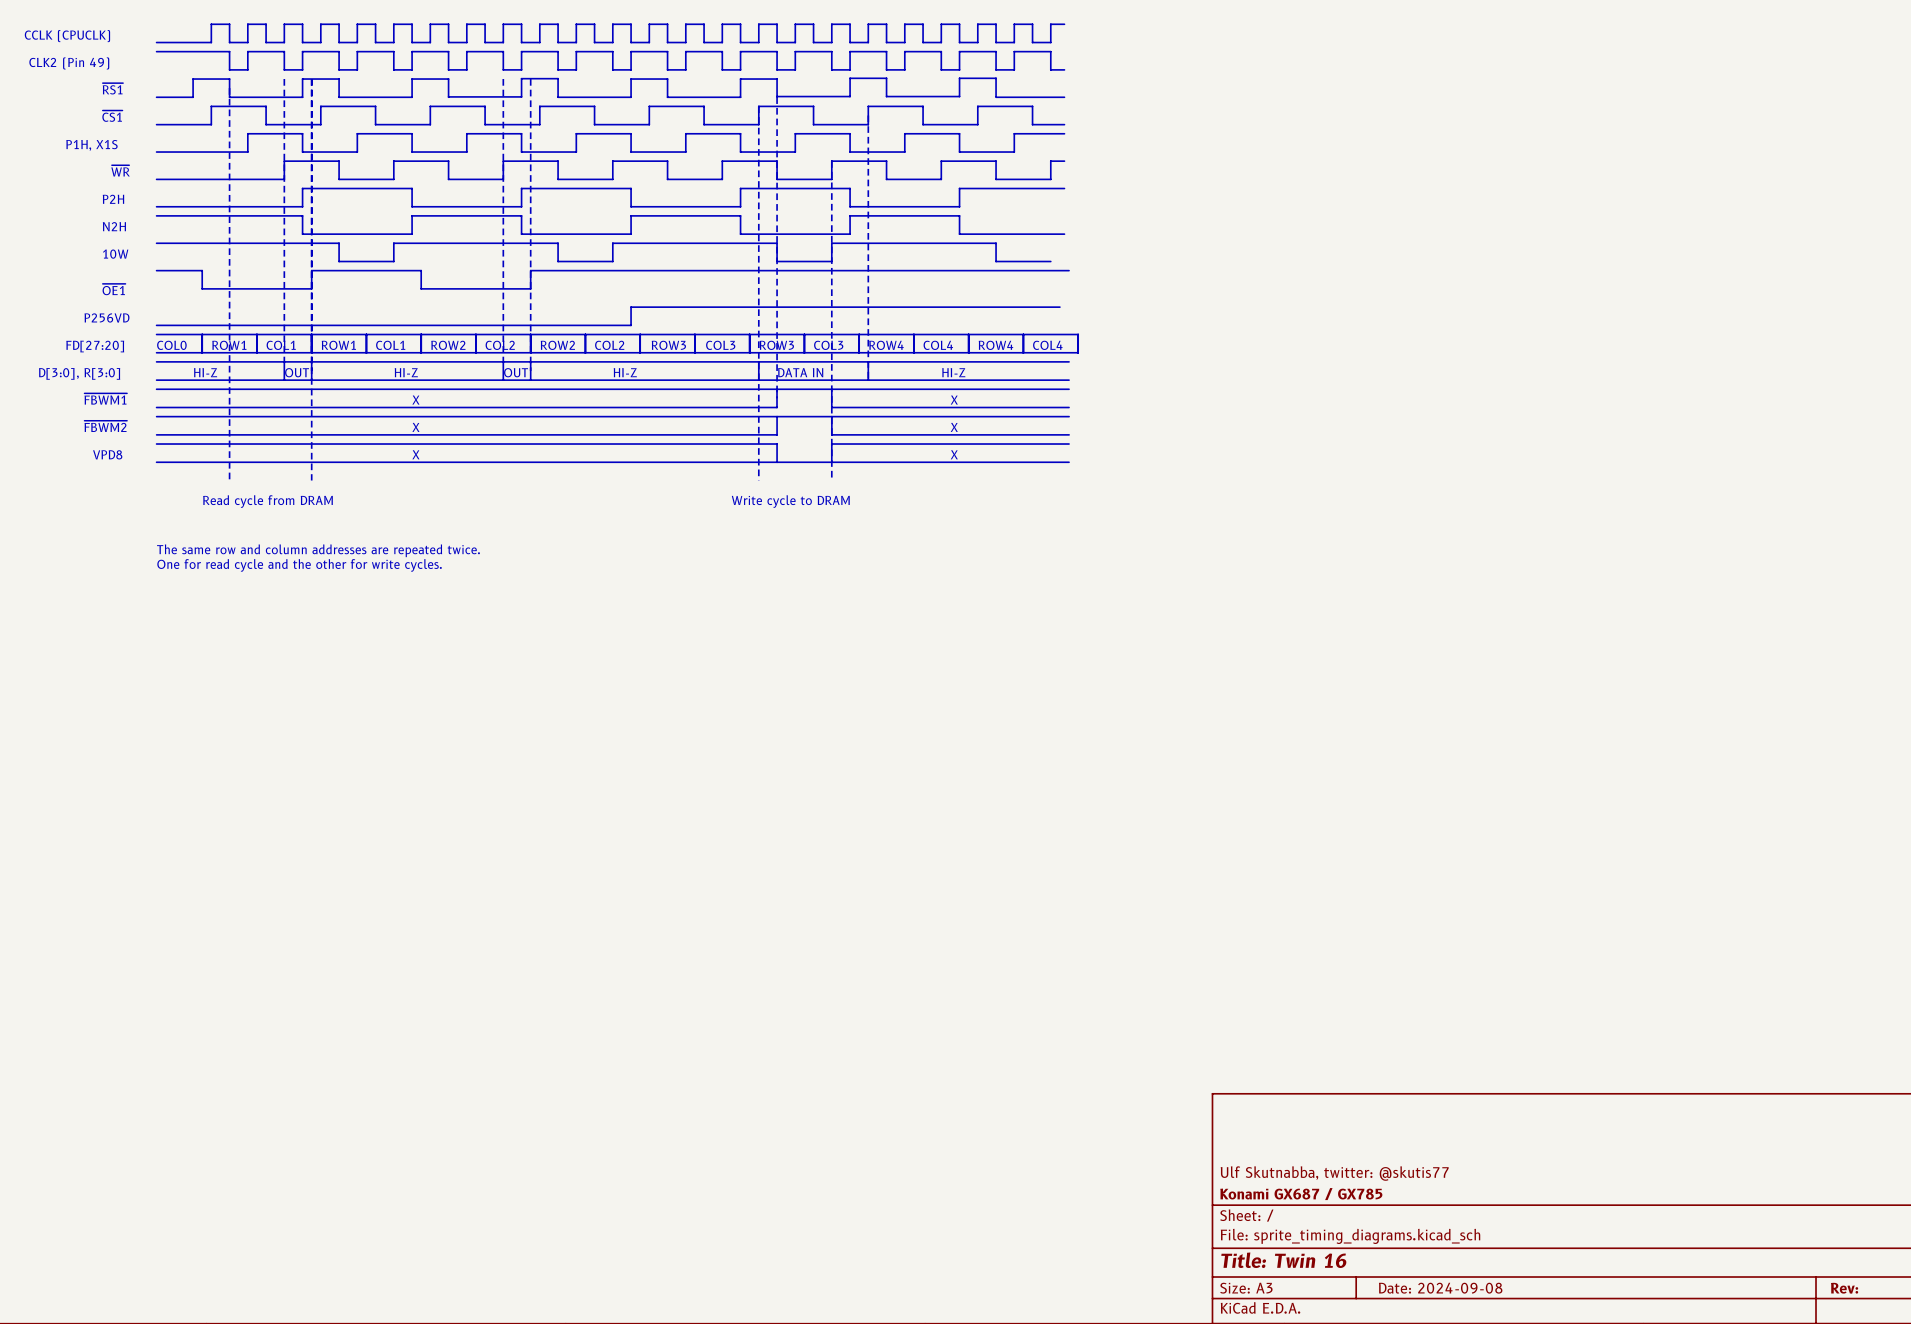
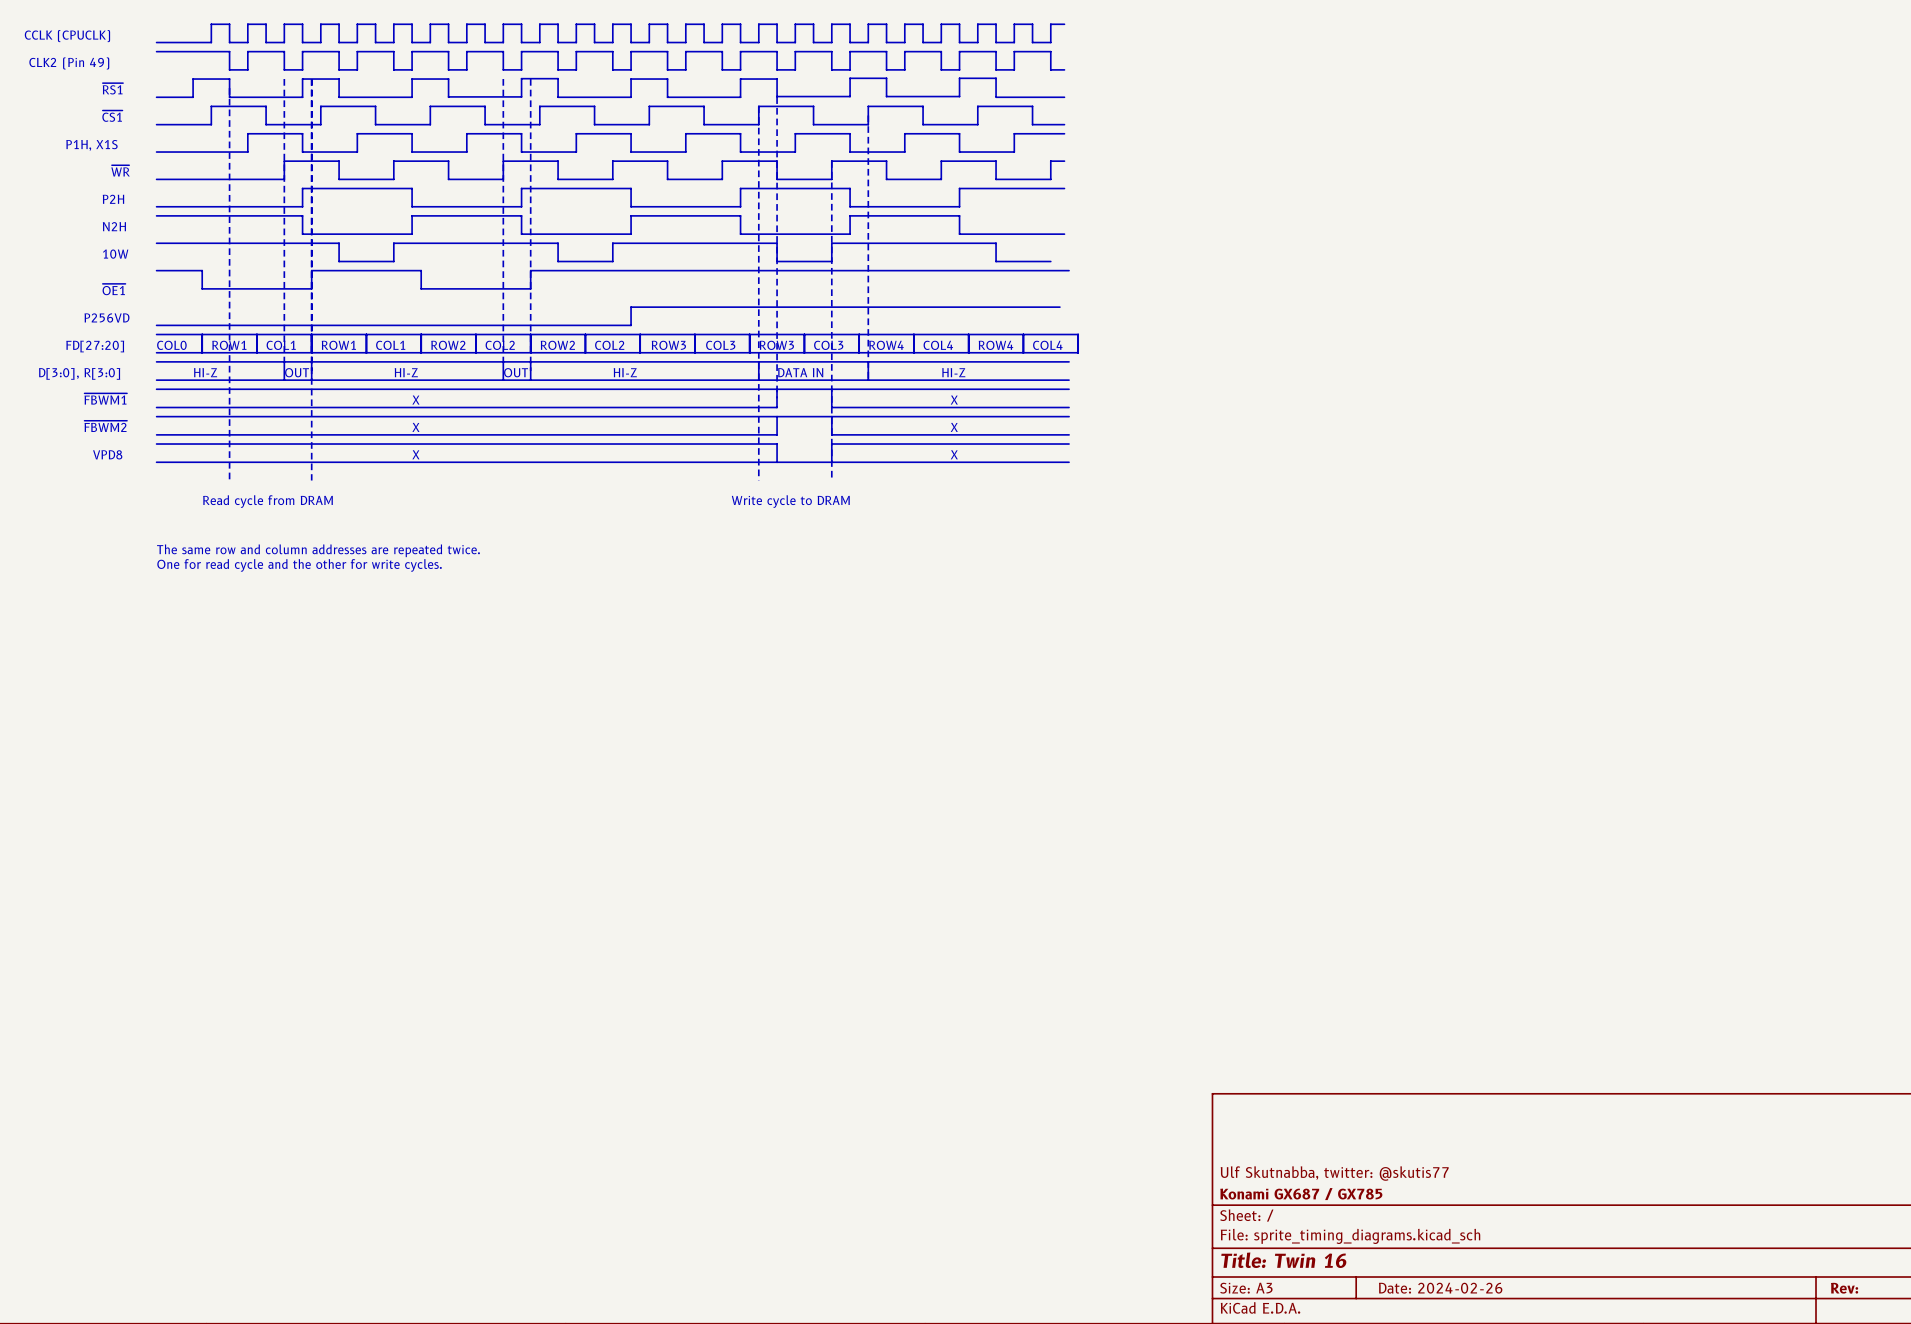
title block: Date: 2024-09-08 (1440, 1288) -> Date: 2024-02-26 (1440, 1288)

